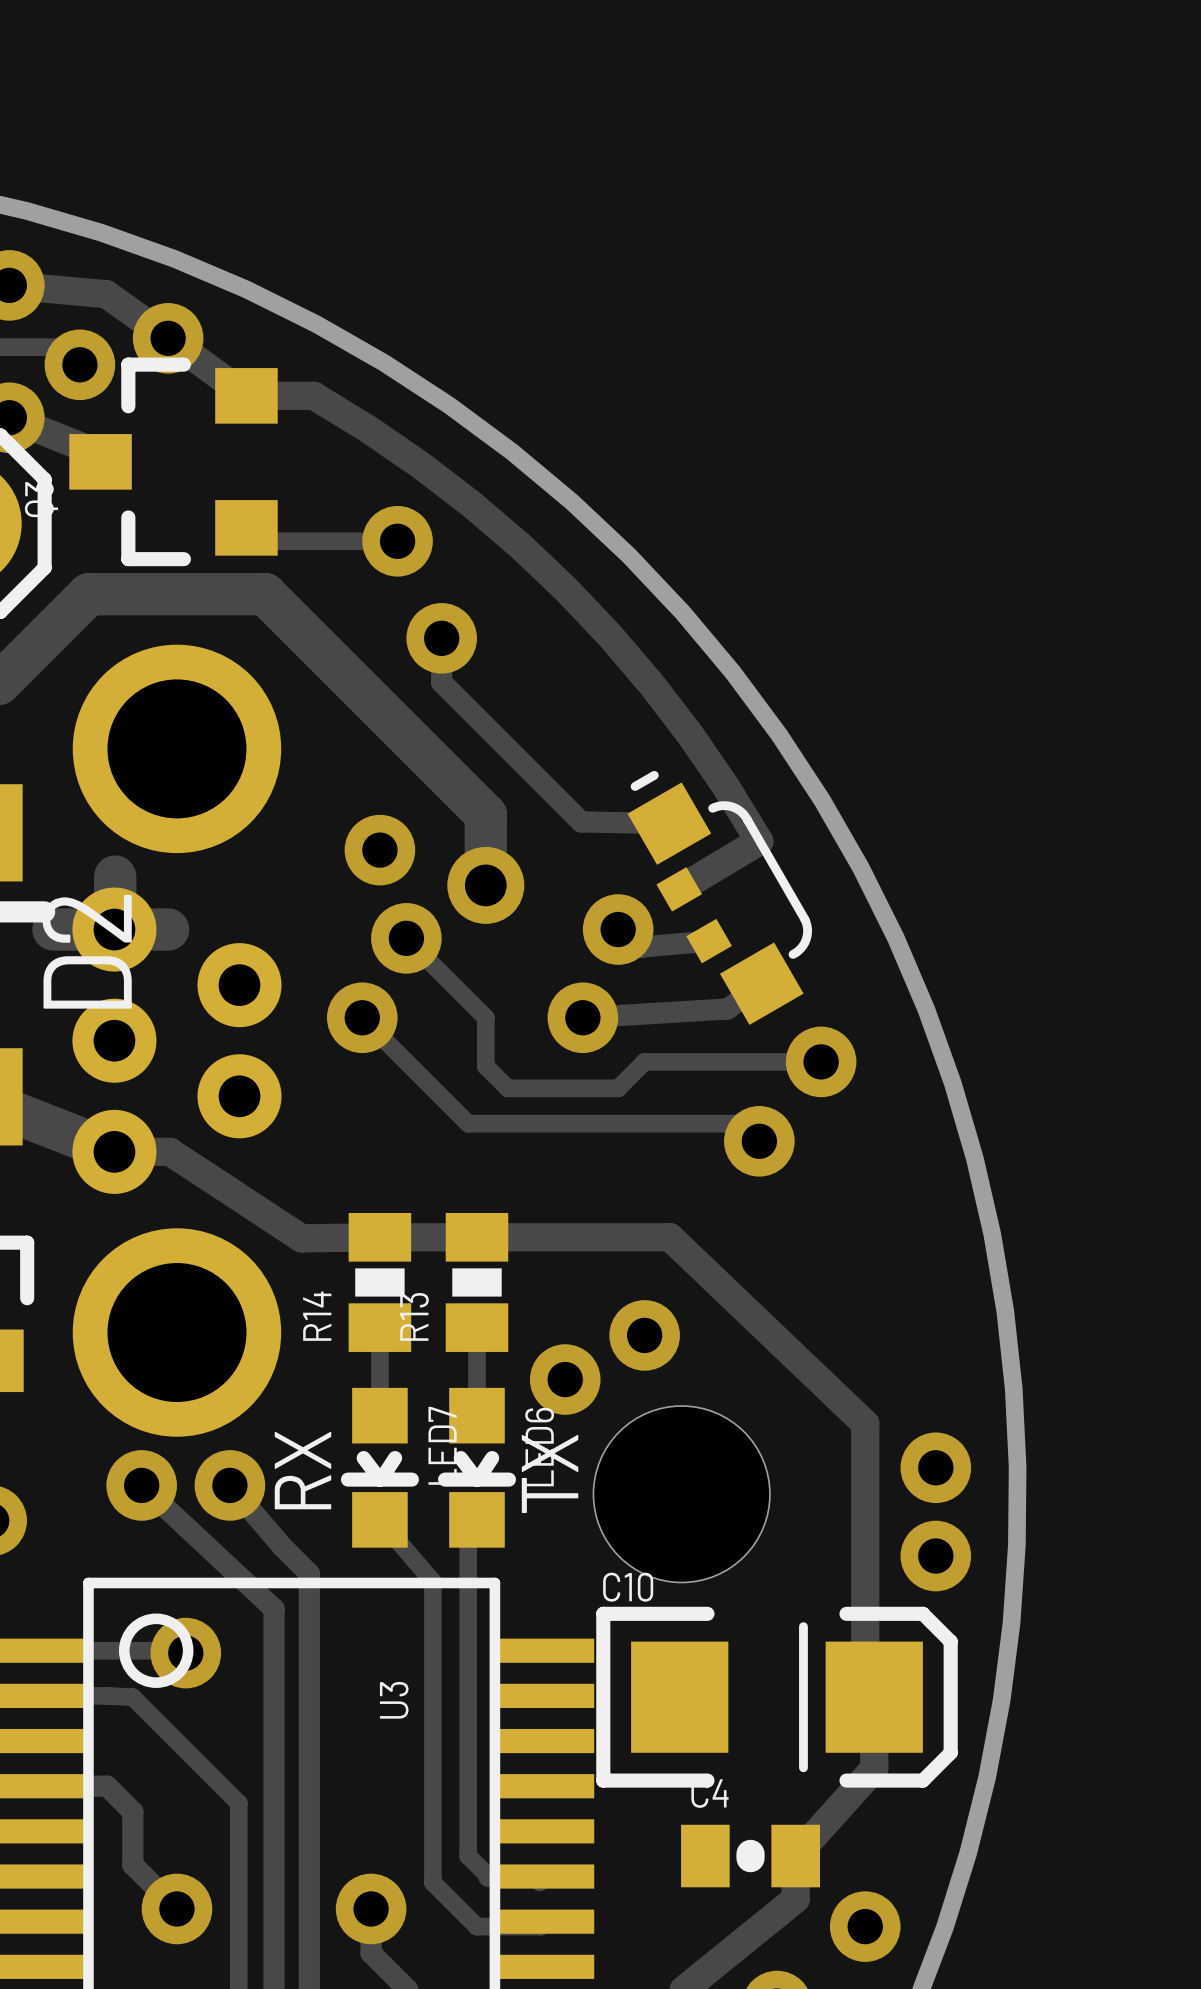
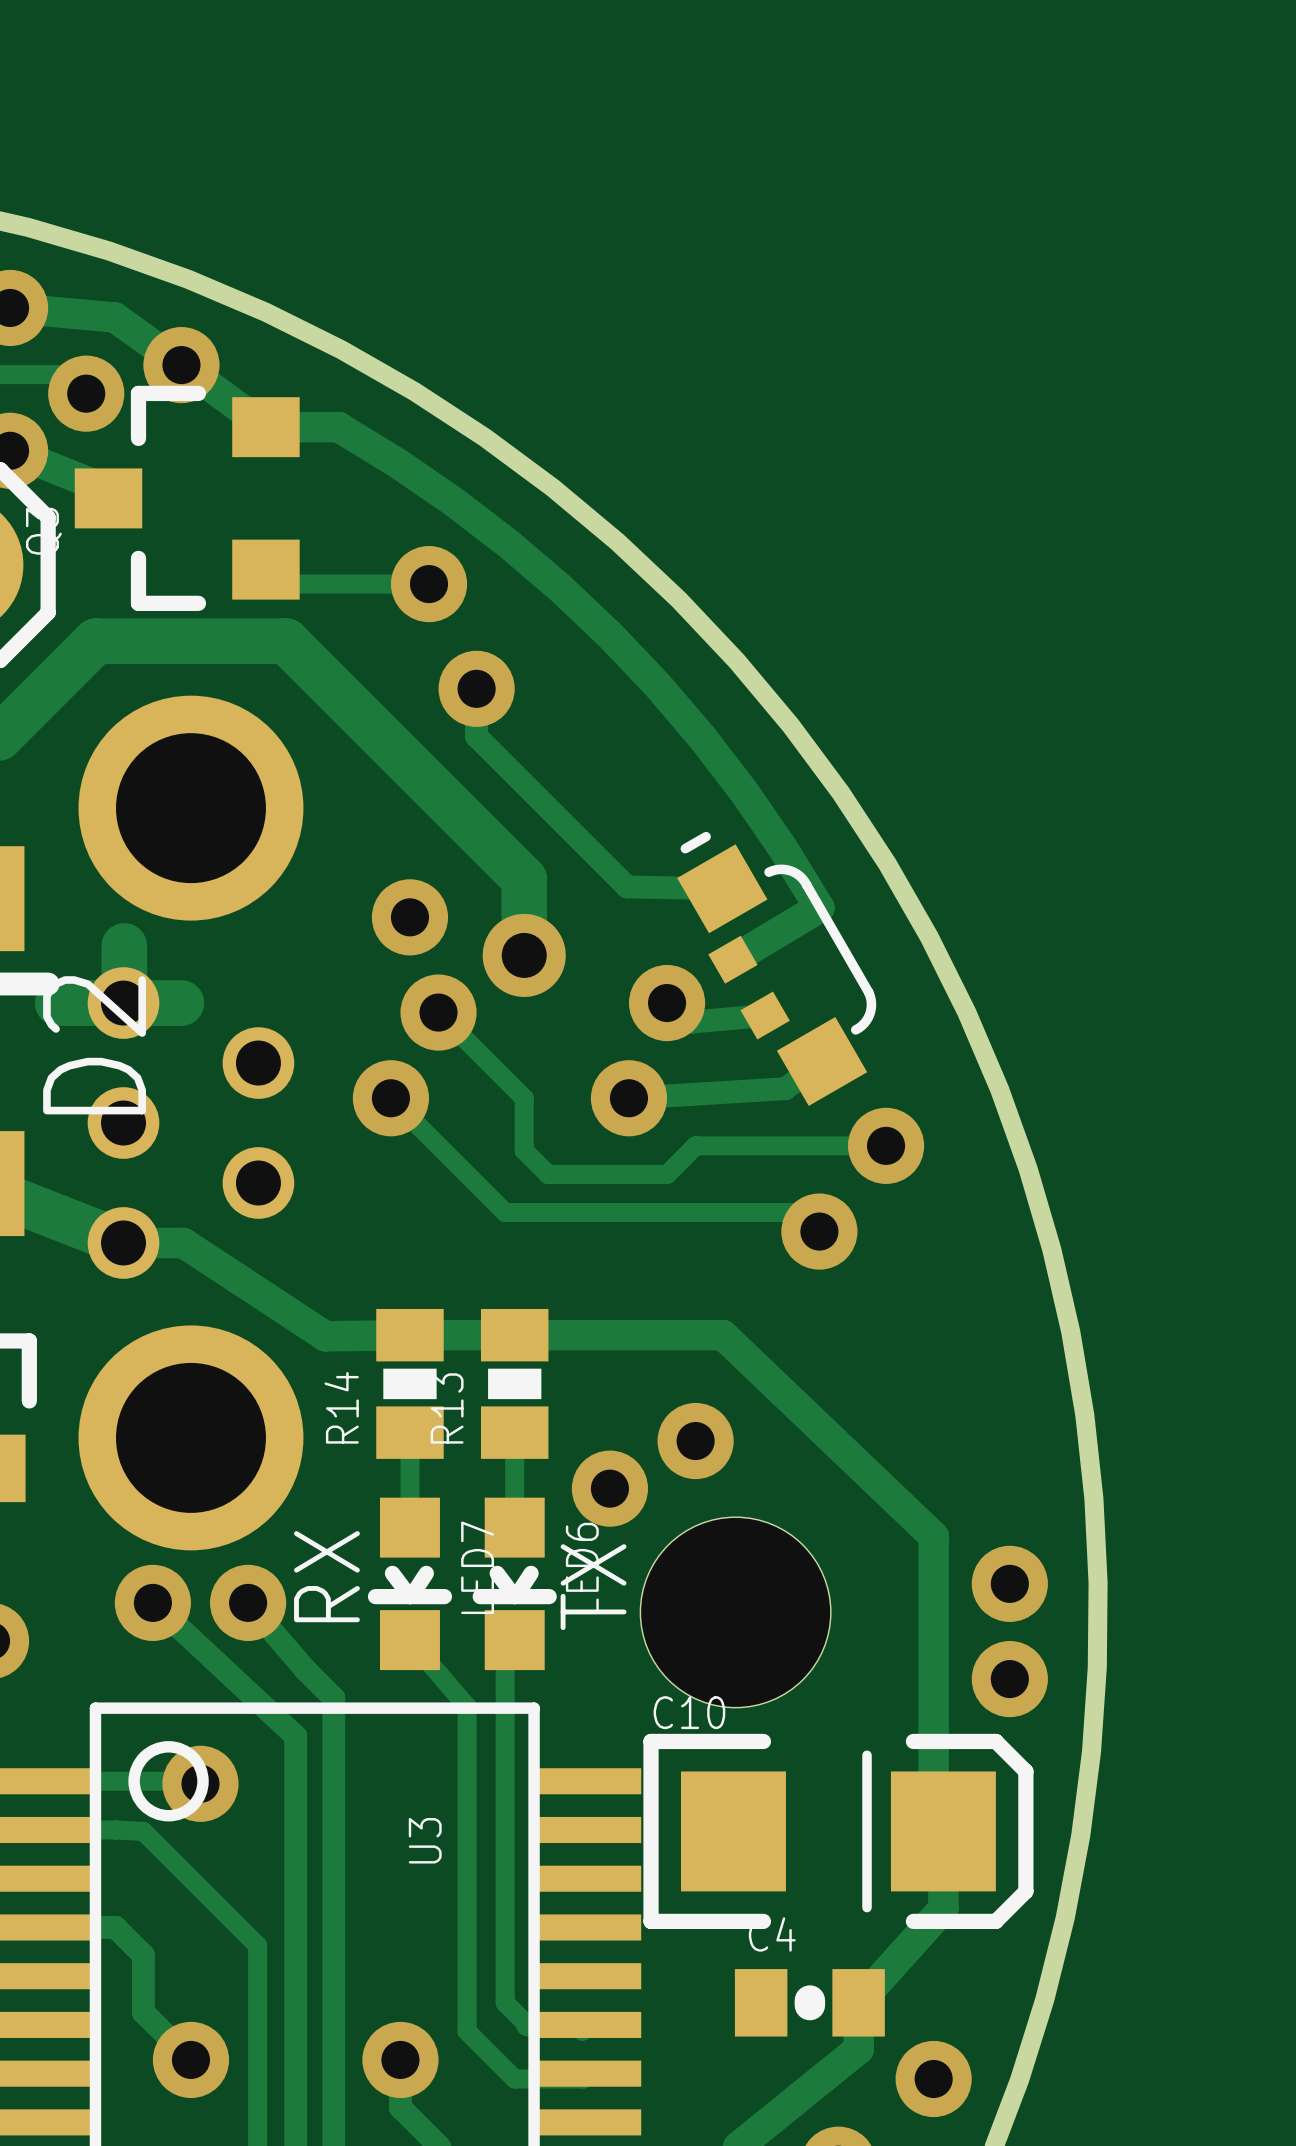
part footprint: [72, 644, 282, 1437] -> [78, 695, 304, 1551]

